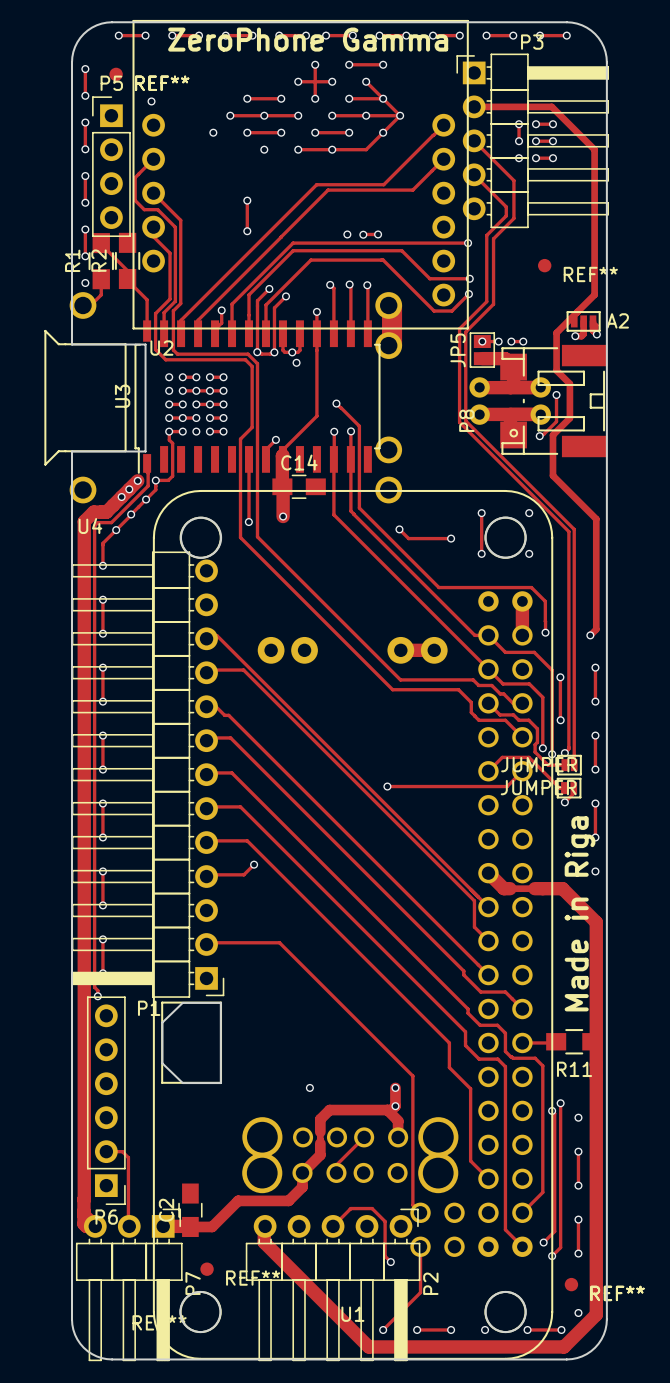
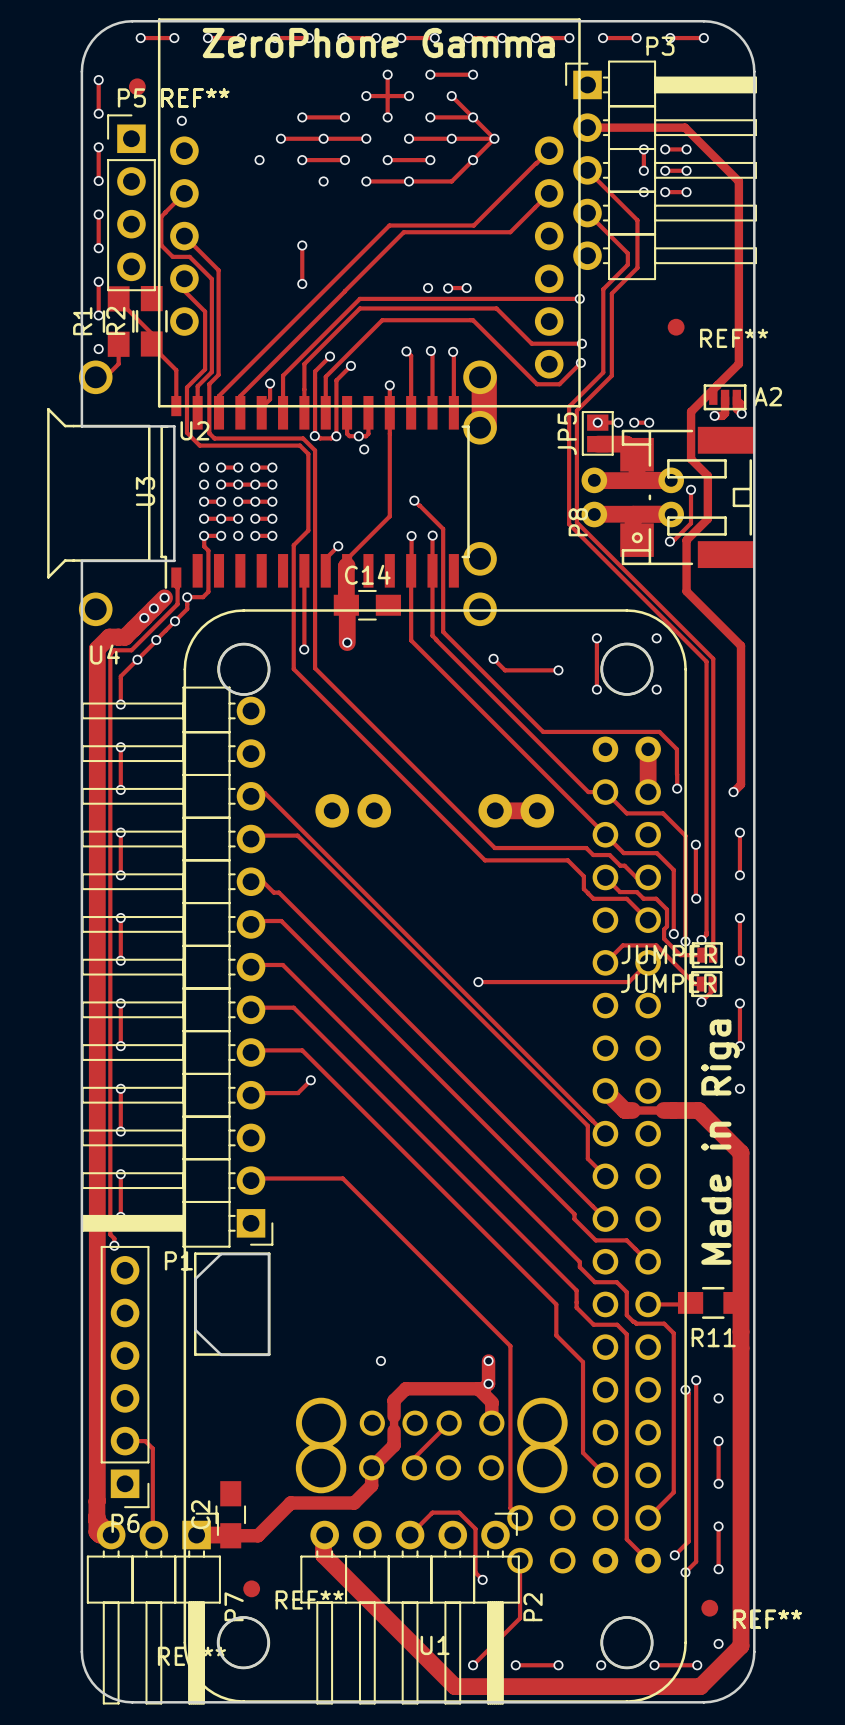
U3 footprint: [134, 320, 381, 474] -> [160, 395, 470, 589]

